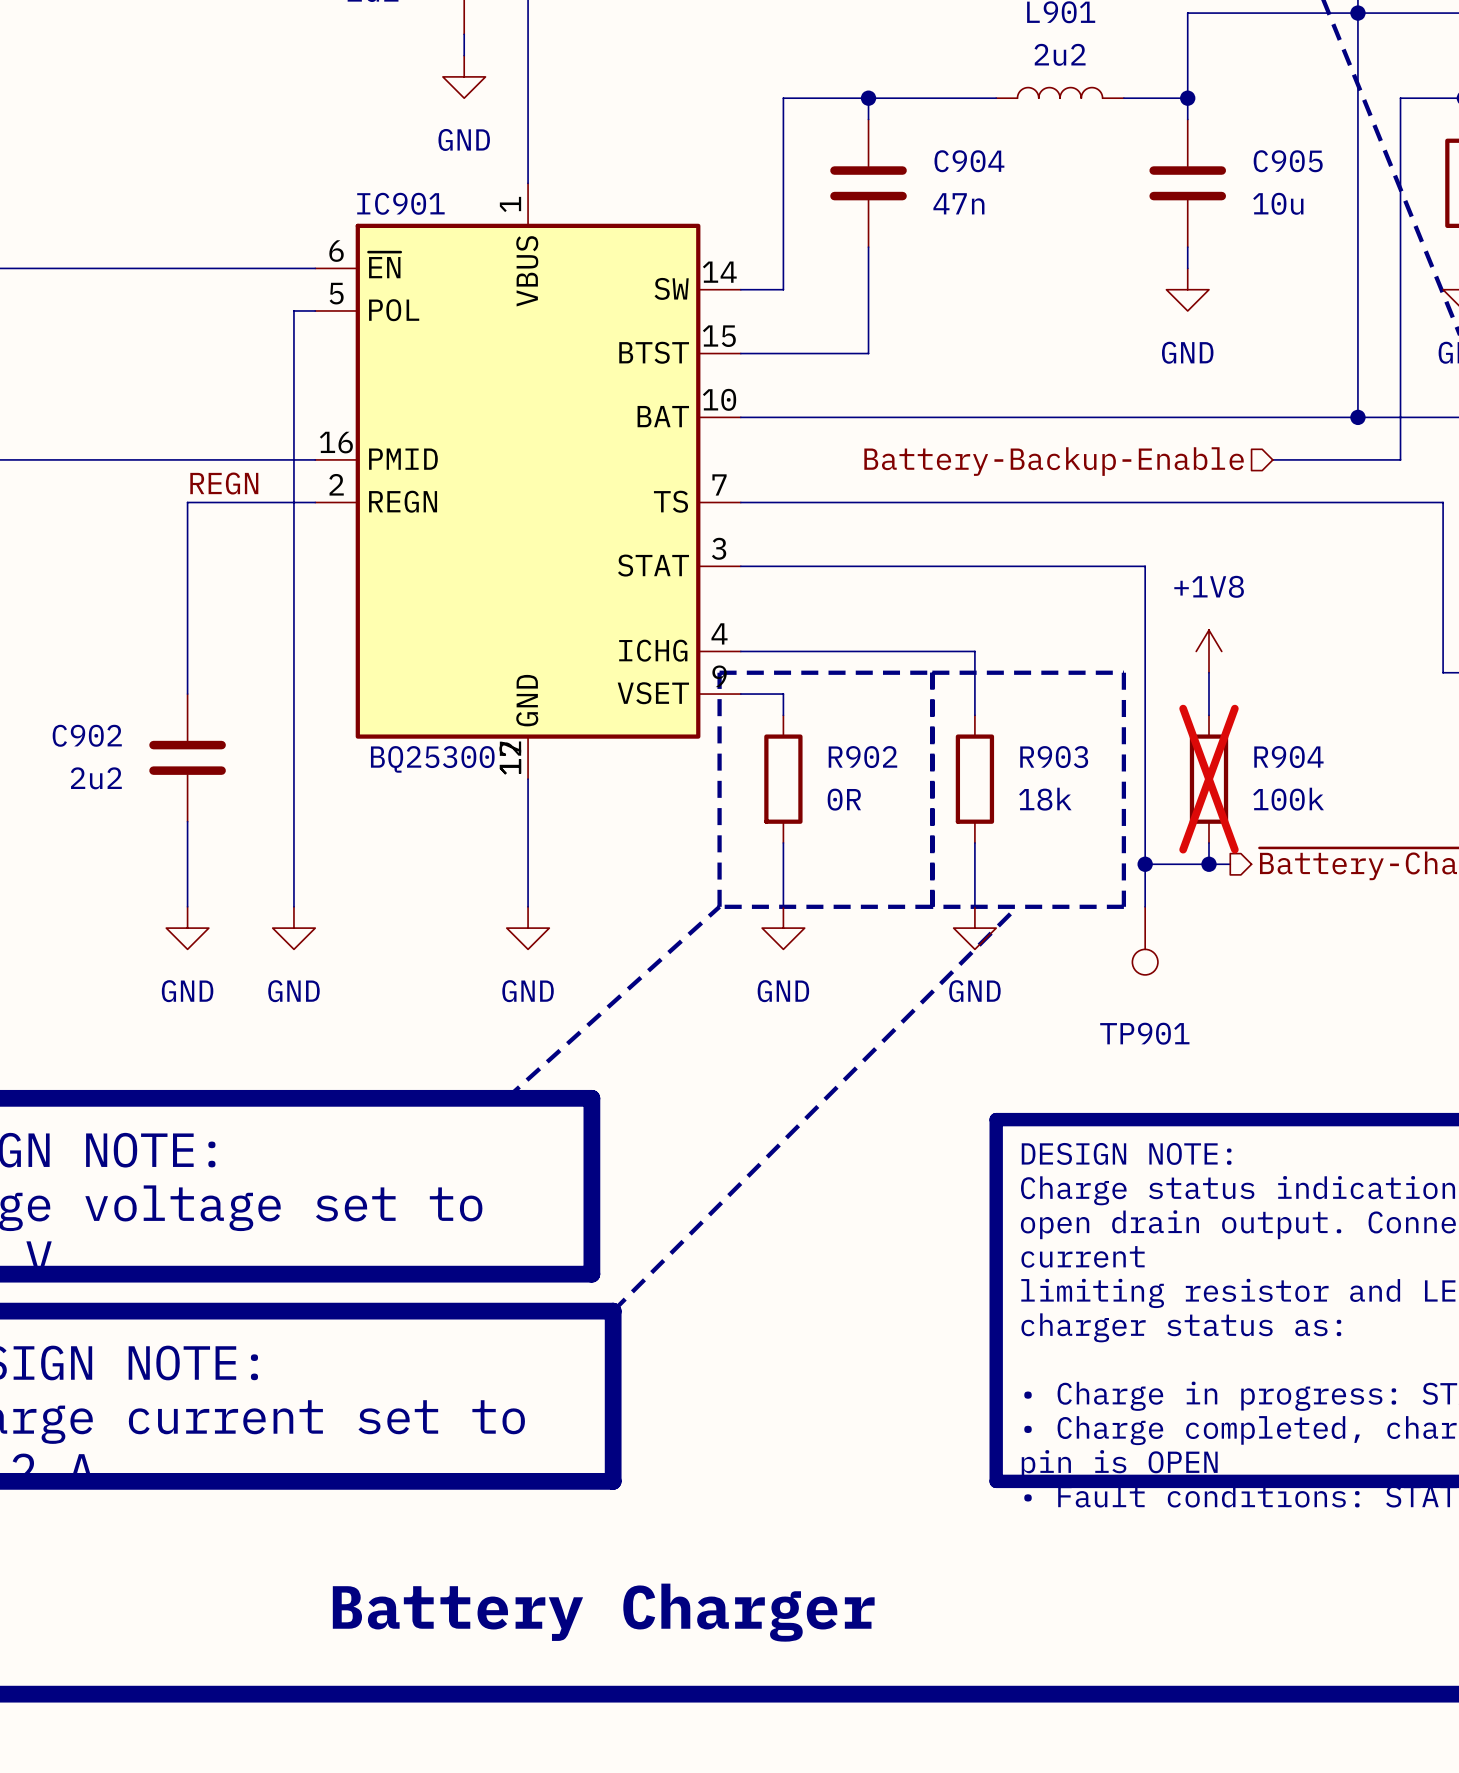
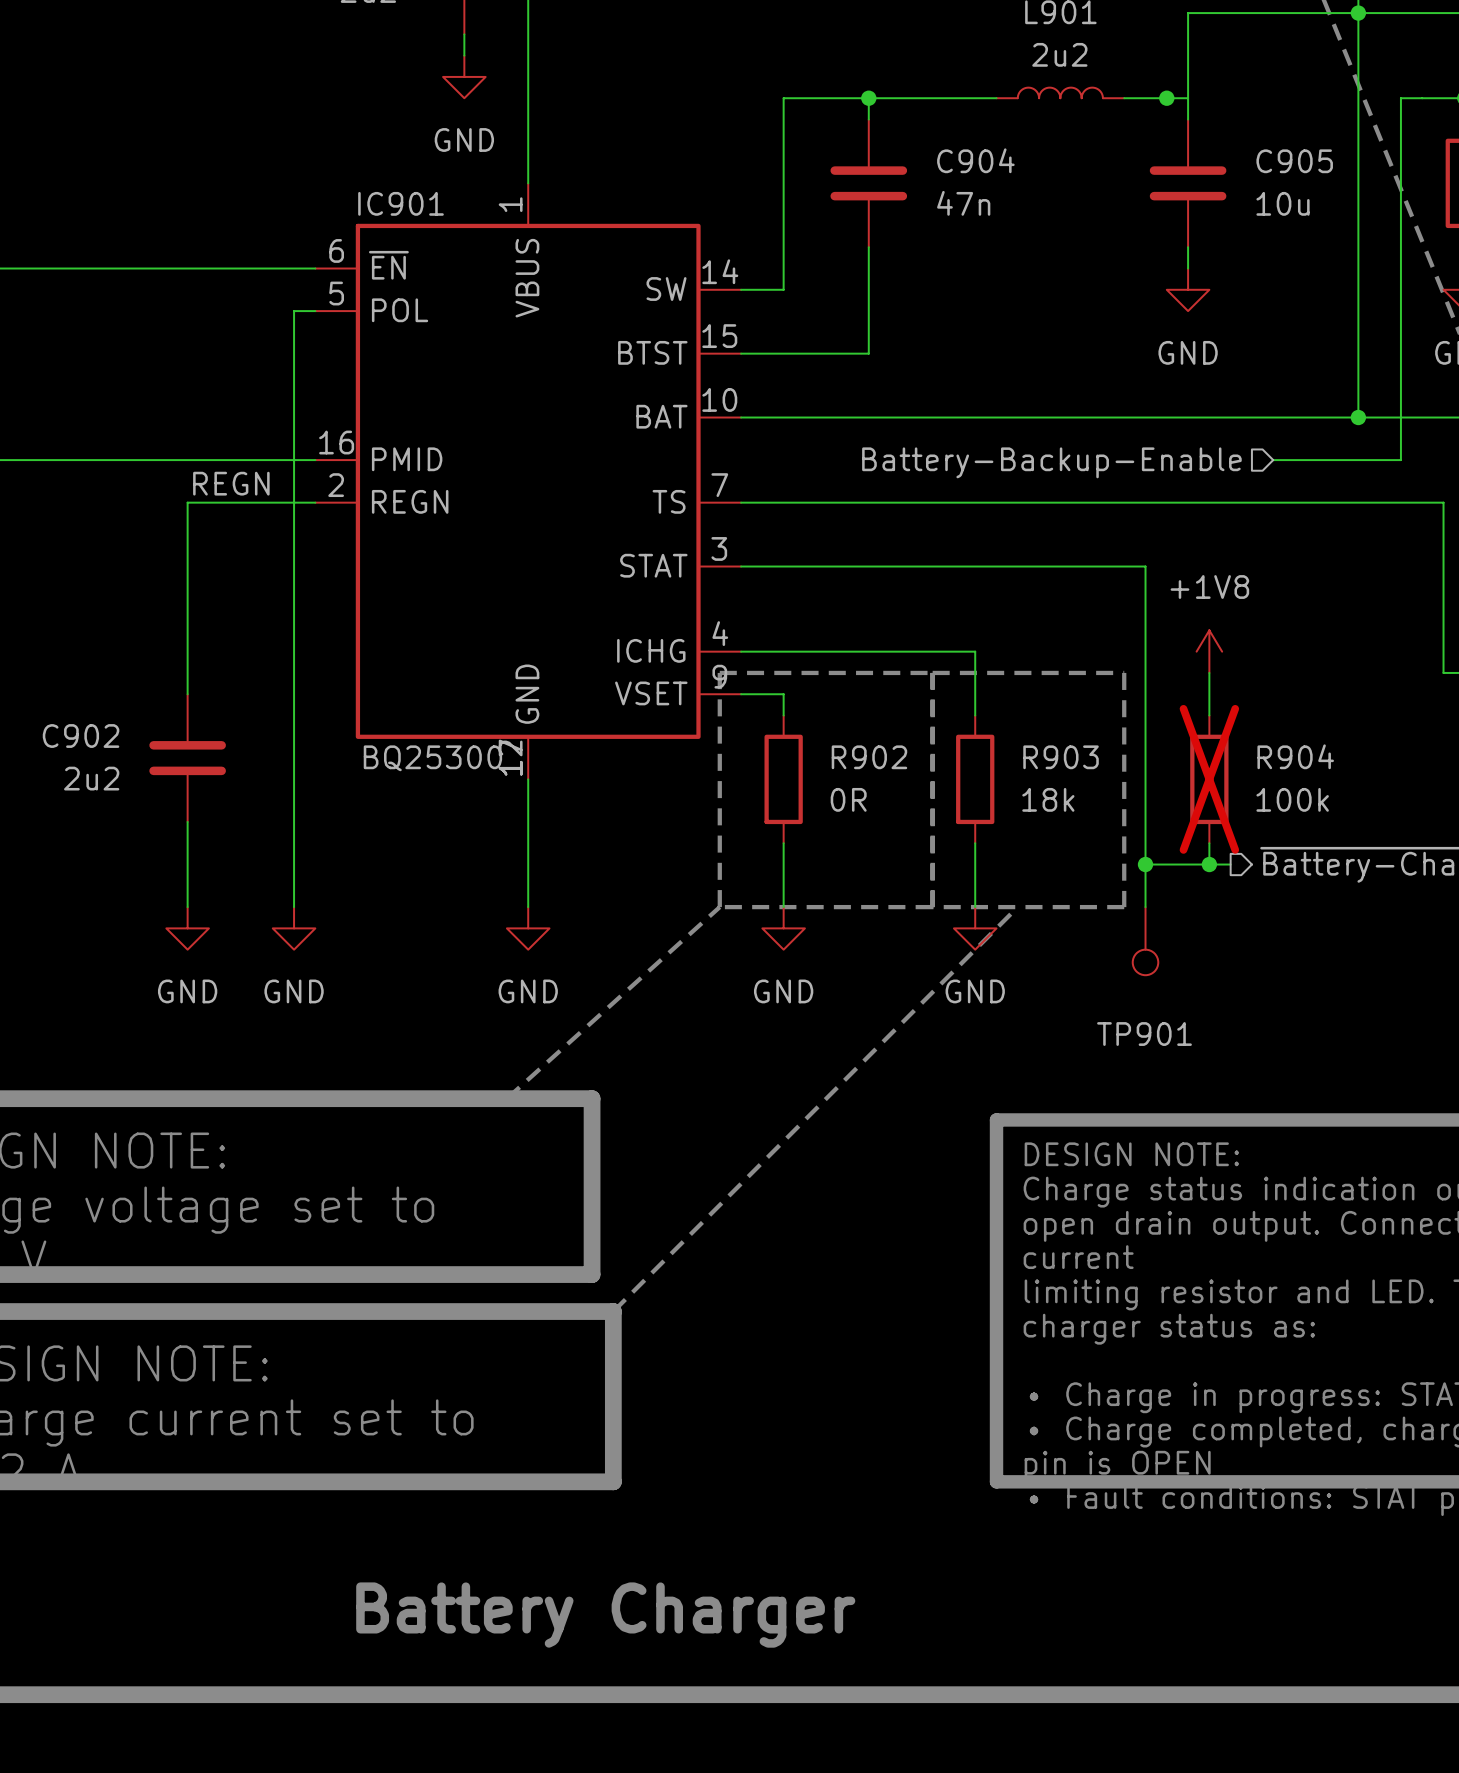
junction position: (1187, 98) -> (1166, 98)

